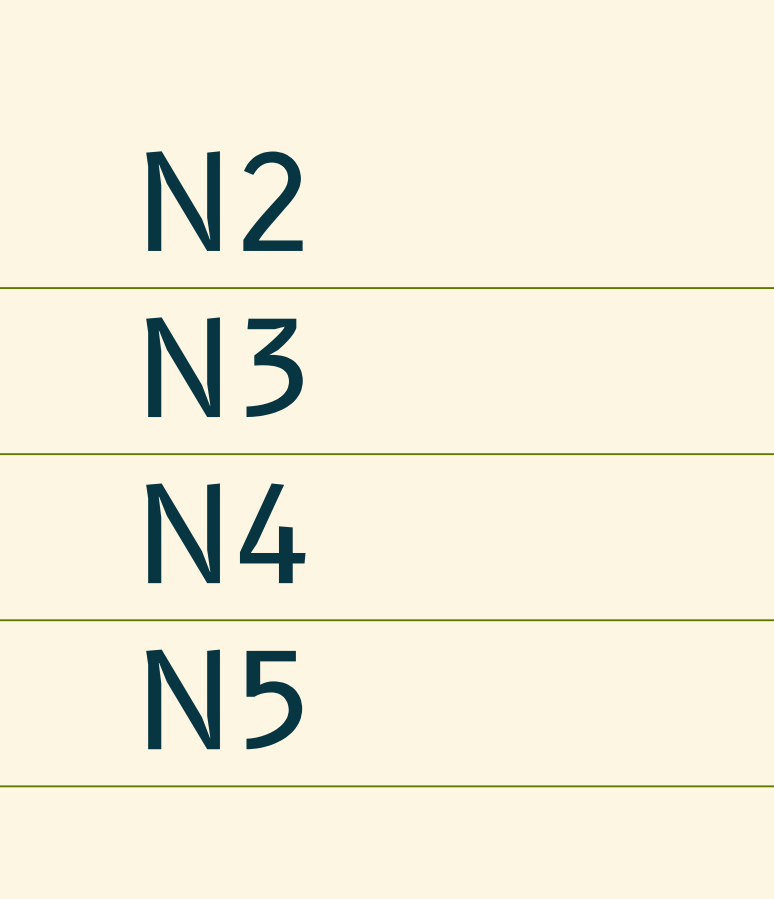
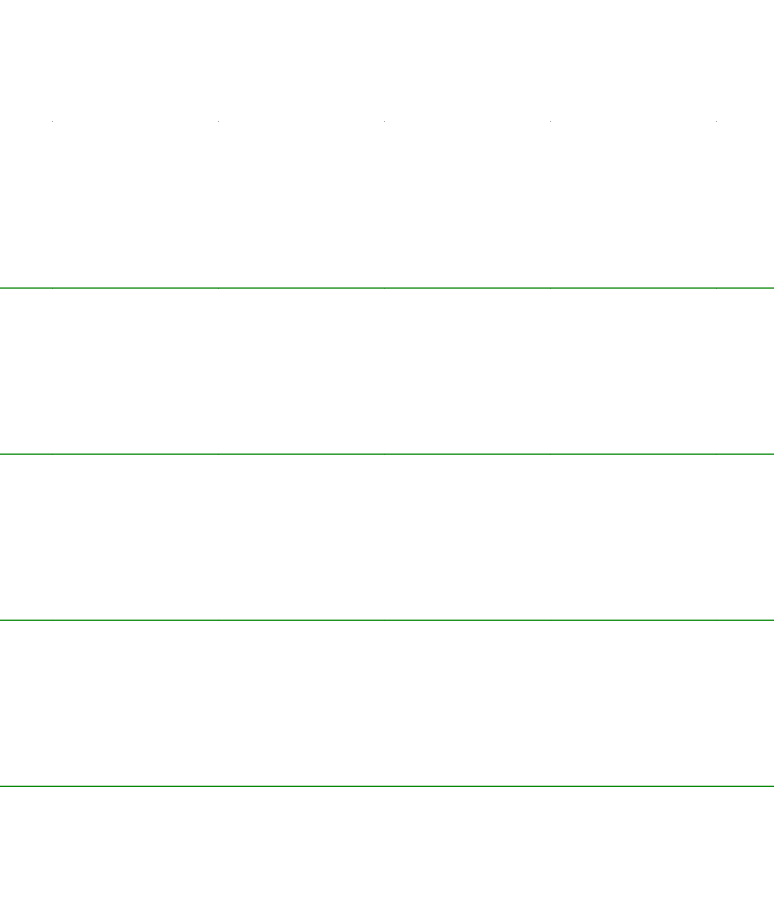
label: N2 (224, 201) -> none
label: N3 (224, 367) -> none
label: N4 (225, 533) -> none
label: N5 (224, 699) -> none

